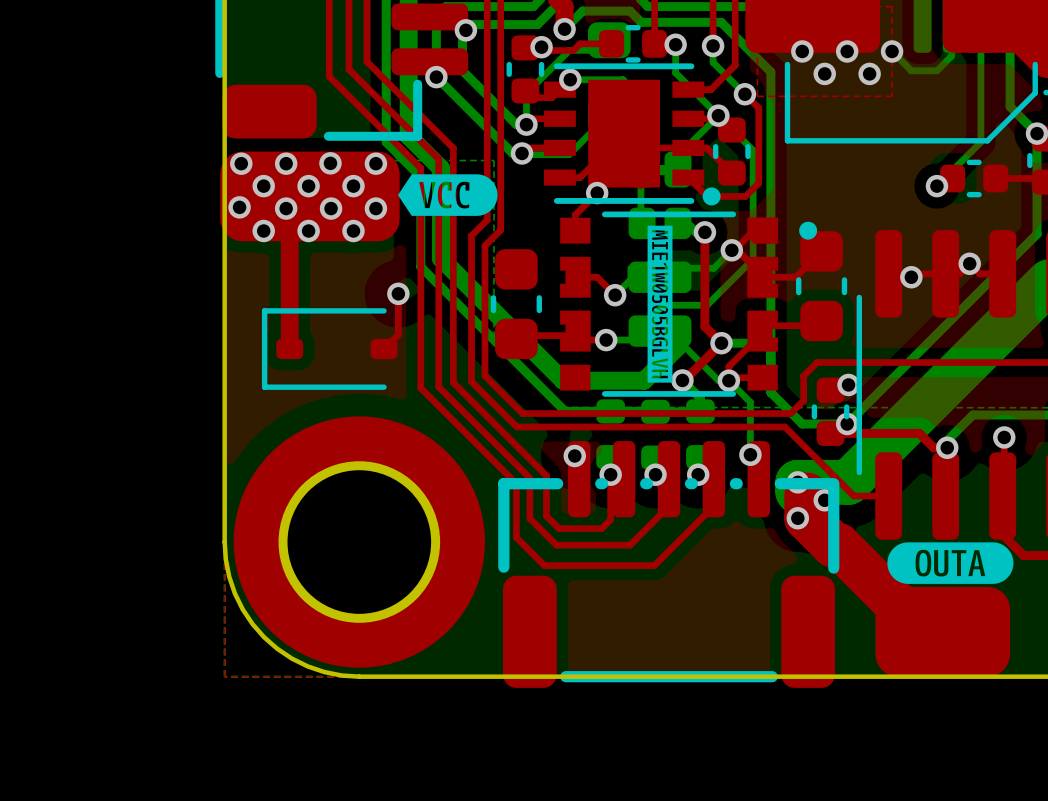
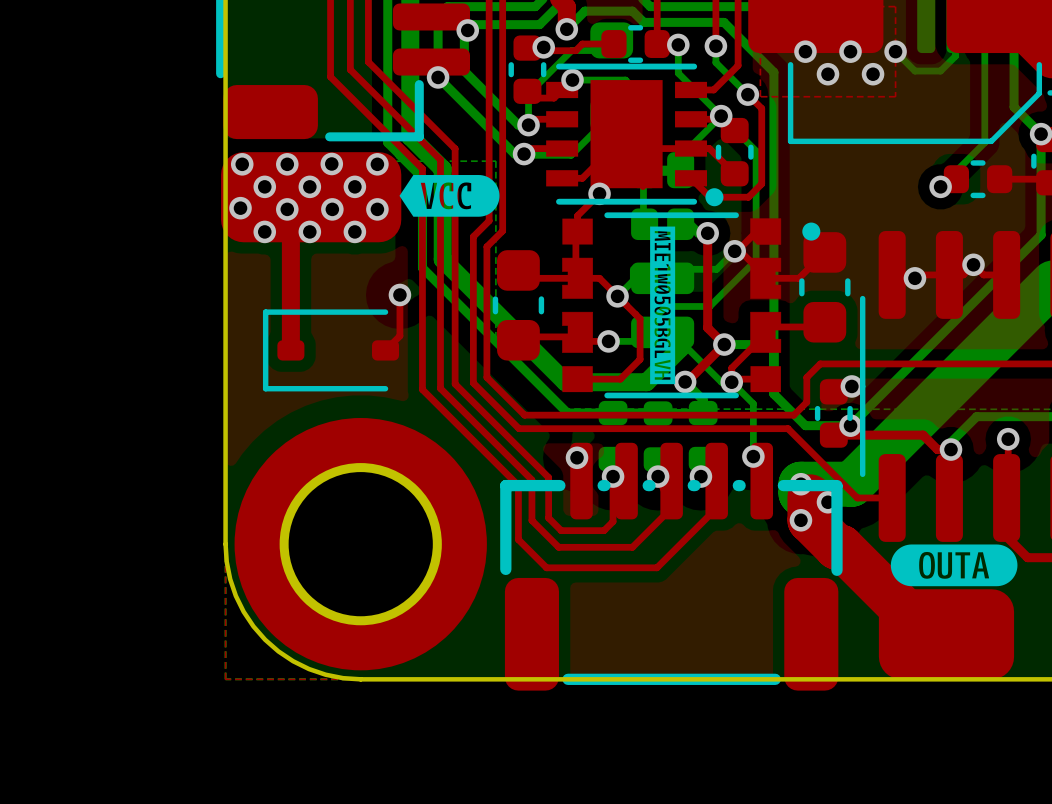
top track: none -> (577, 231) (575, 233) (575, 278) (523, 278)
top track: none -> (617, 296) (640, 318) (640, 359) (620, 379) (577, 379)

